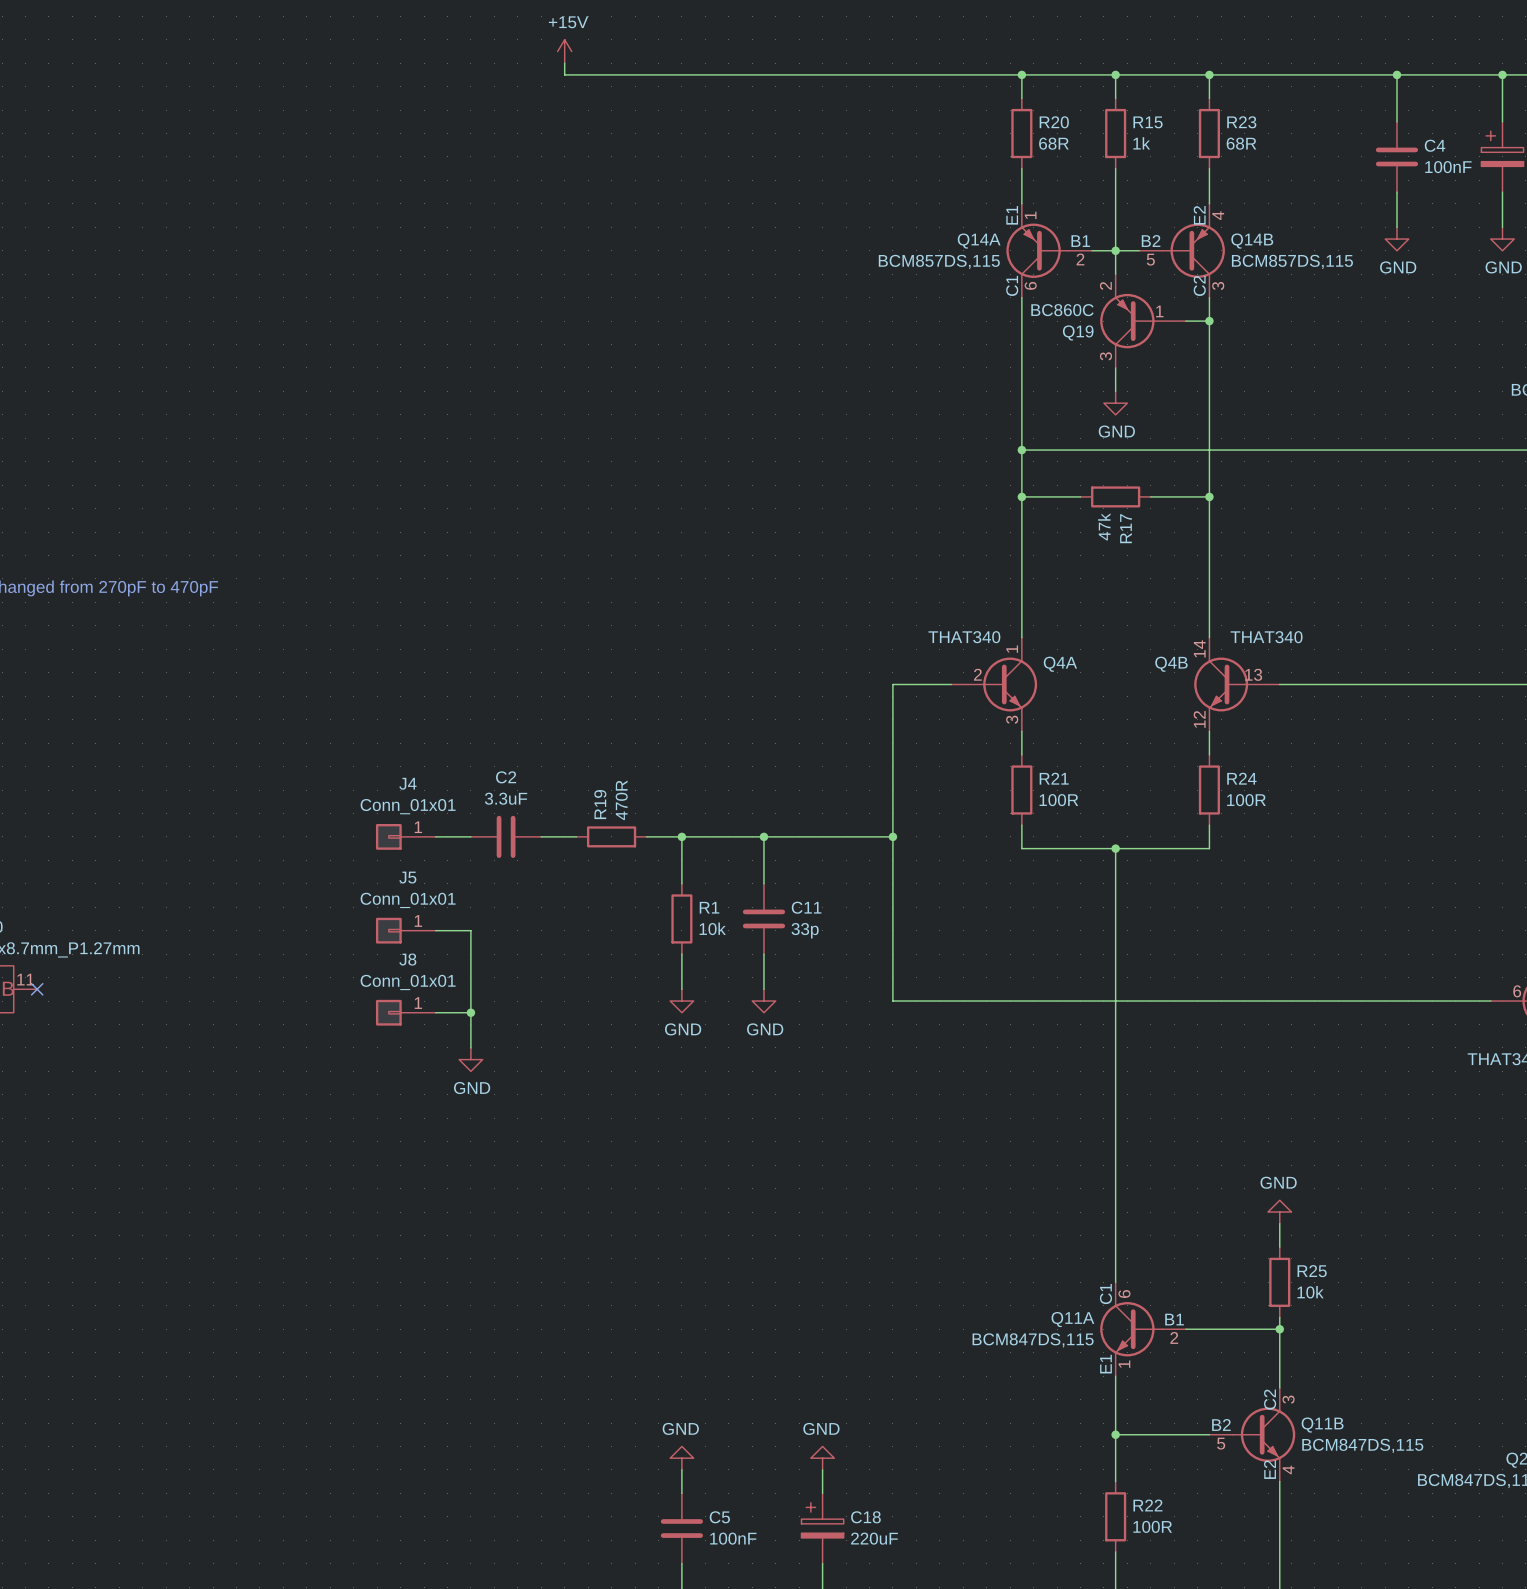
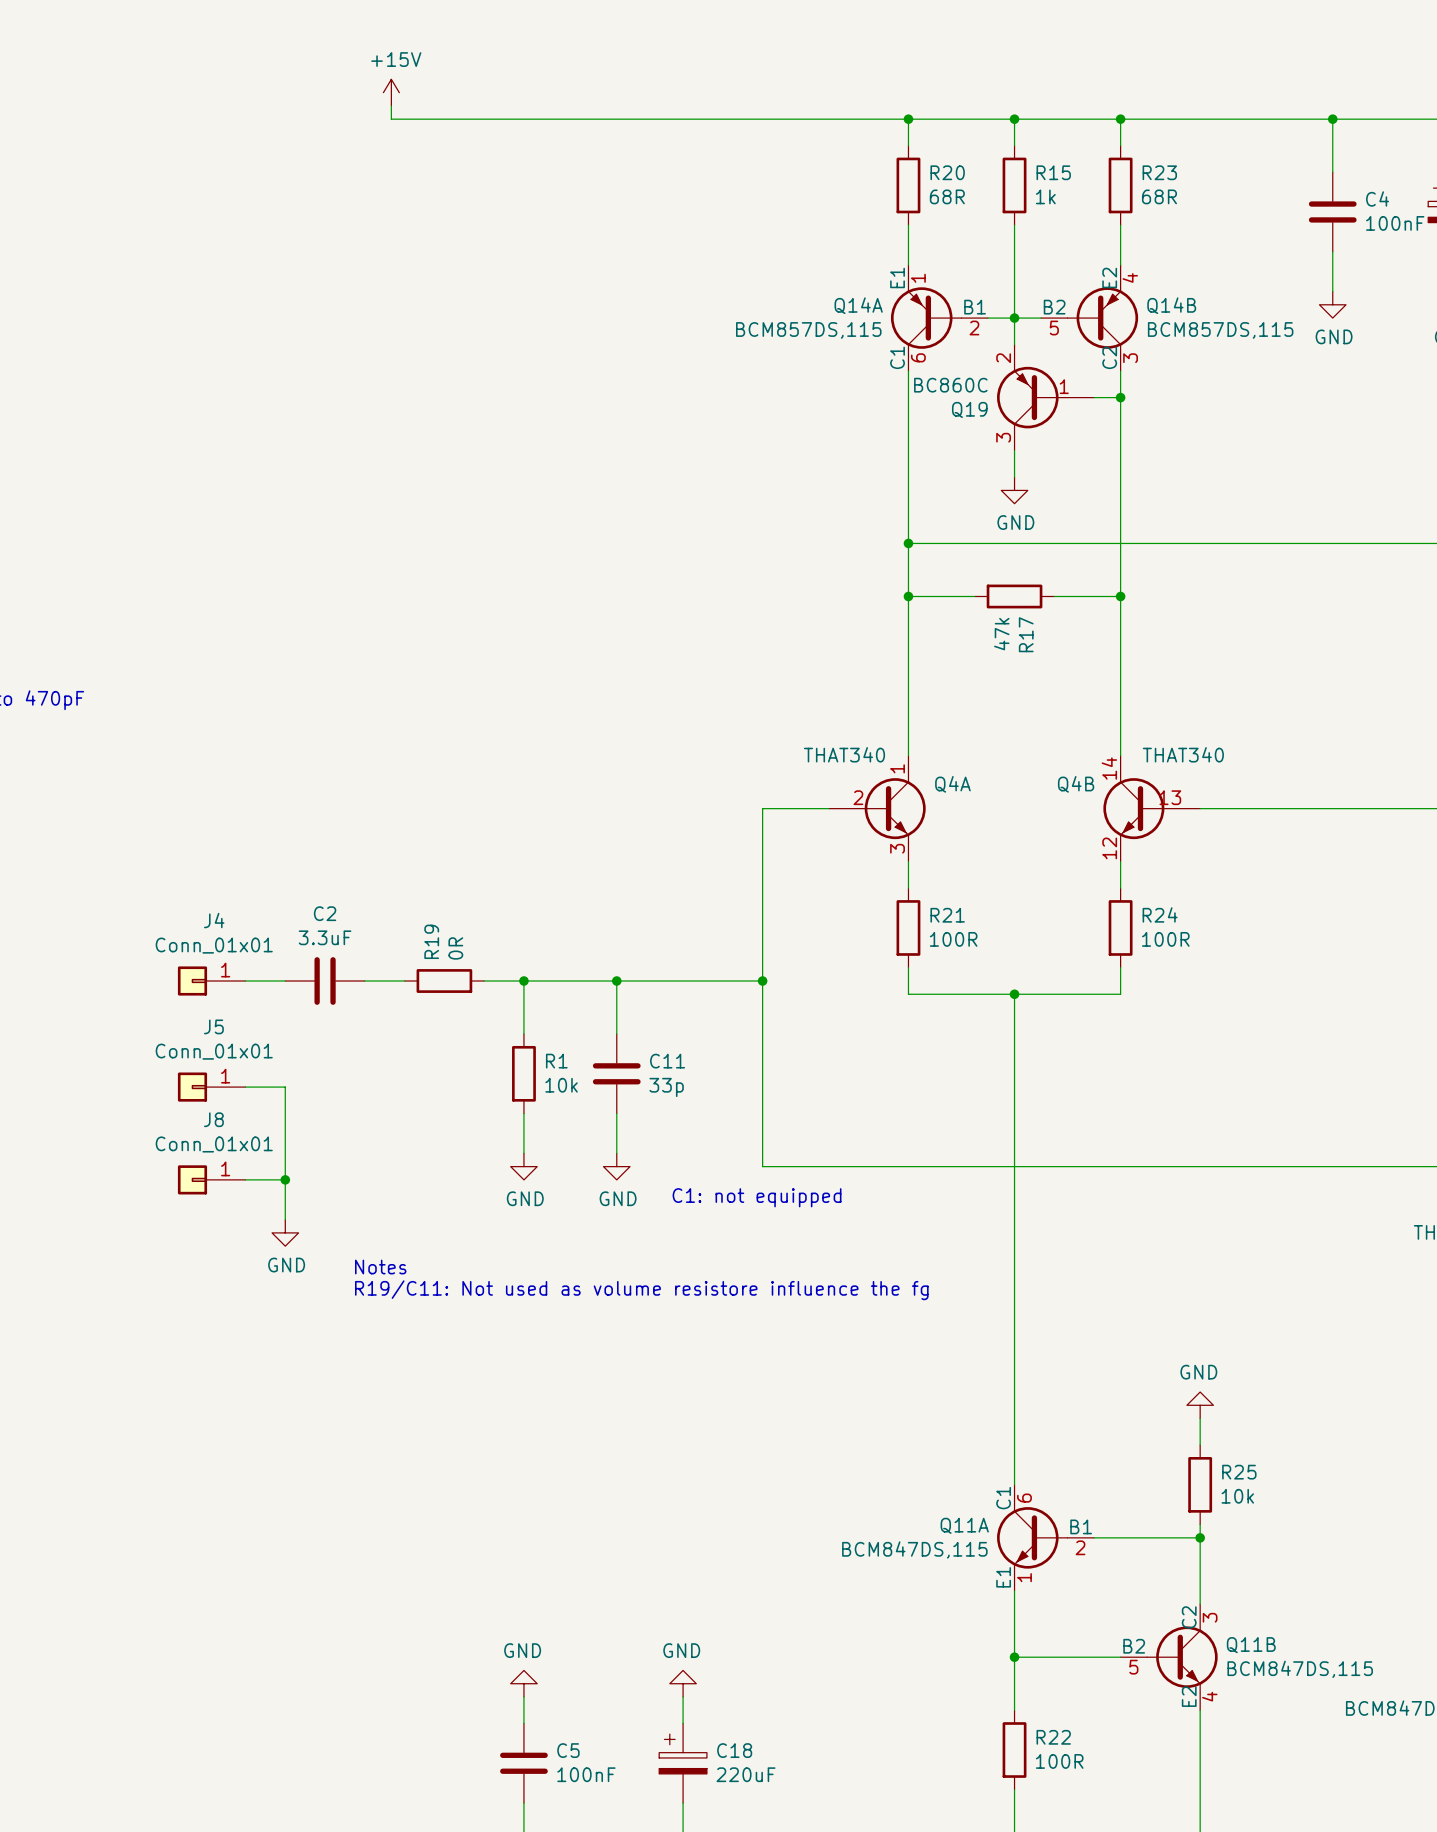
R19 value: 470R (621, 800) -> 0R (455, 948)
text: none -> C1: not equipped (757, 1197)
text: none -> Notes (380, 1267)
text: none -> R19/C11: Not used as volume resistore influence the fg (641, 1290)

